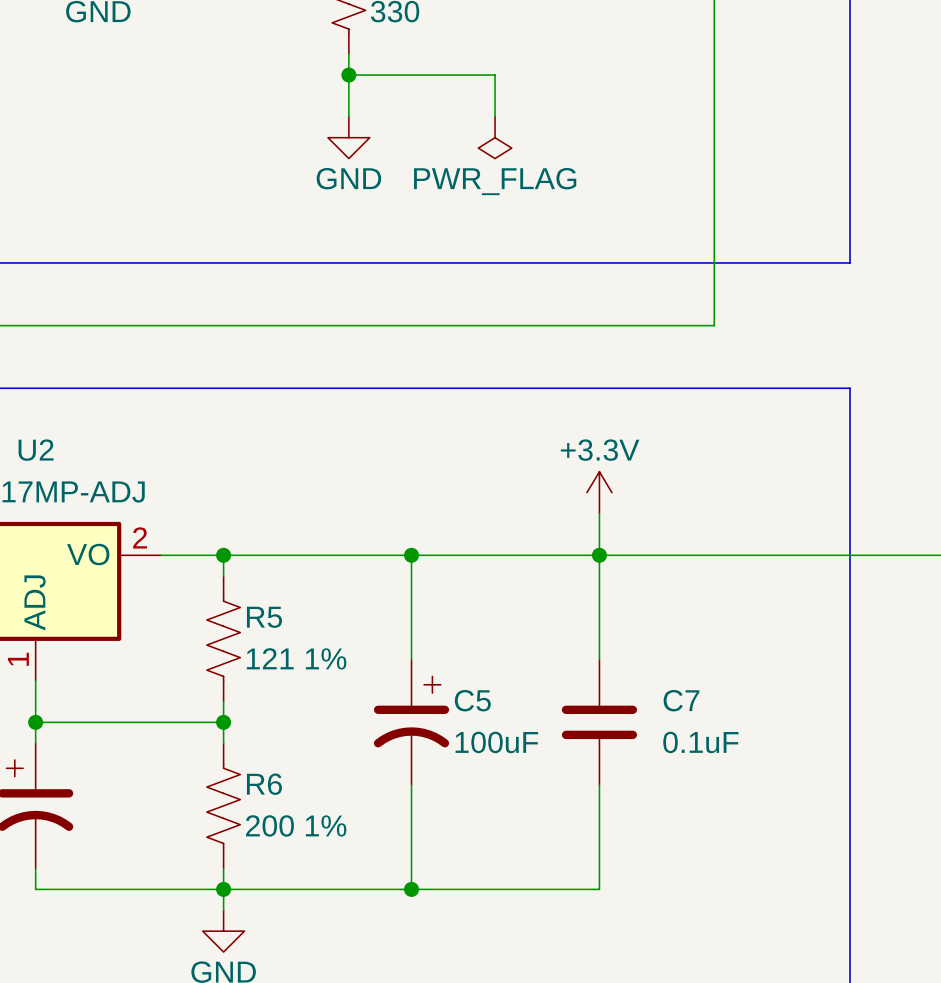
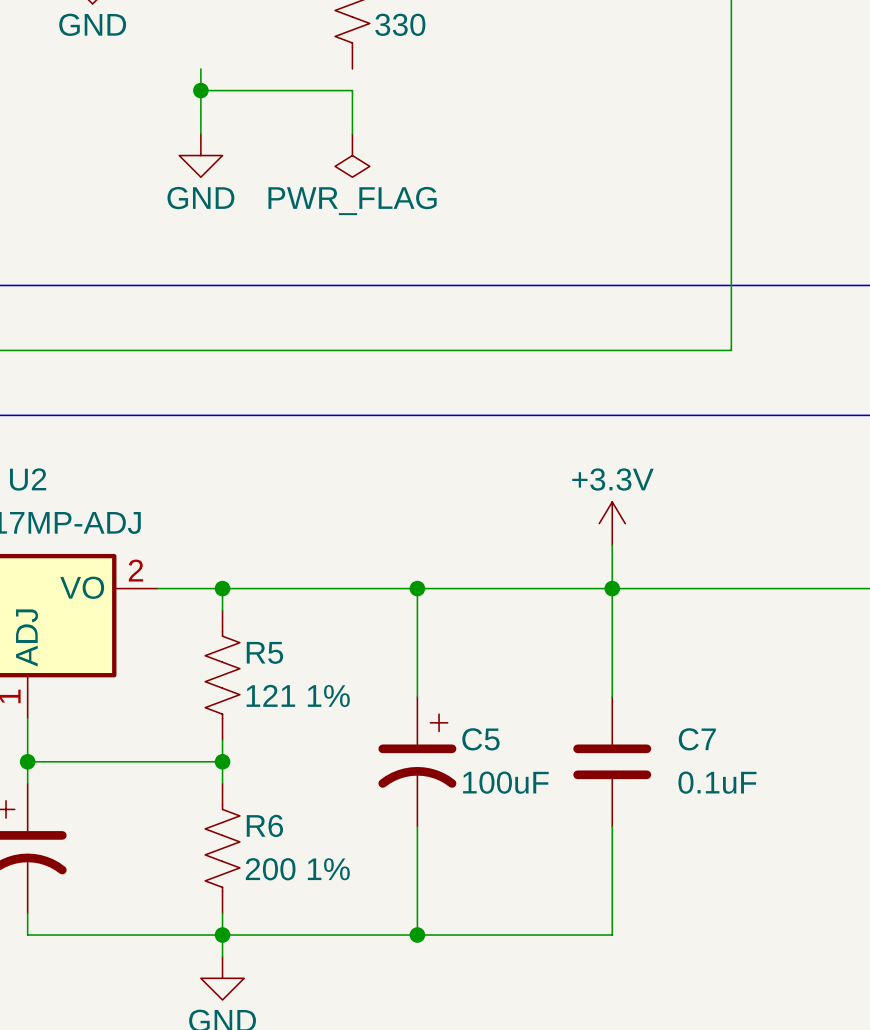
wire: none -> (200, 68) (200, 133)
wire: (348, 54) (348, 75) (495, 75) (495, 116) -> none
wire: none -> (200, 90) (352, 90)
junction: none -> (200, 90)
junction: (348, 75) -> none
power symbol: none -> GND (200, 155)
power symbol: GND (348, 137) -> PWR_FLAG (352, 155)
power symbol: PWR_FLAG (495, 137) -> none

